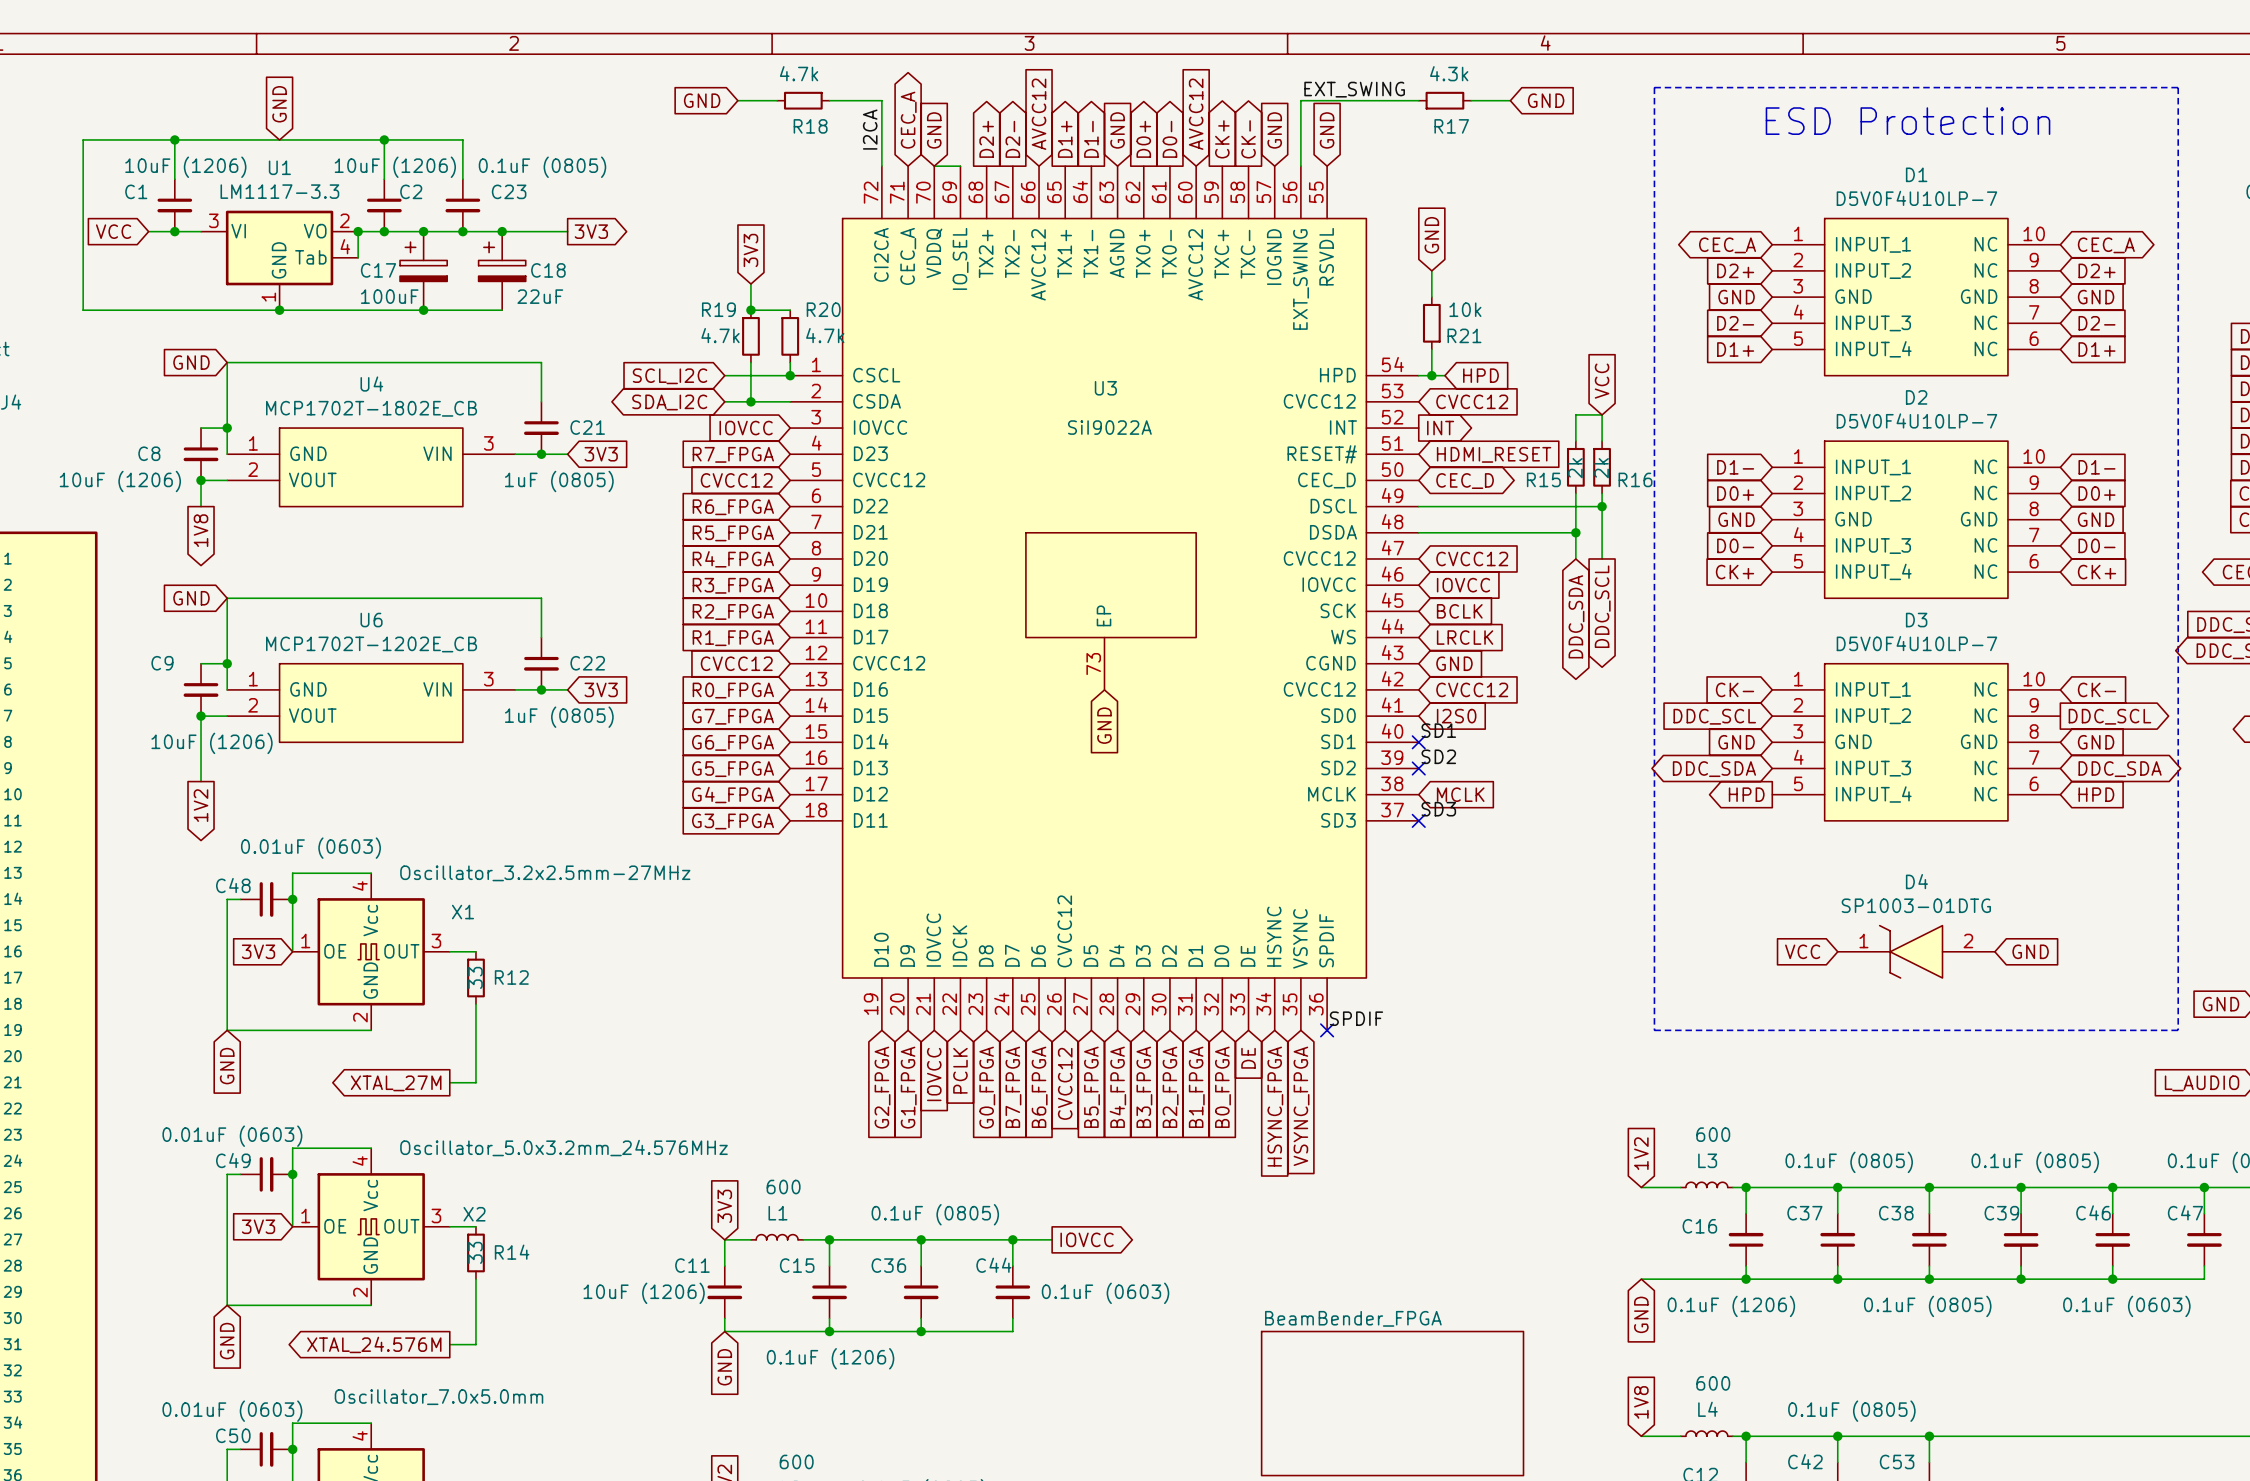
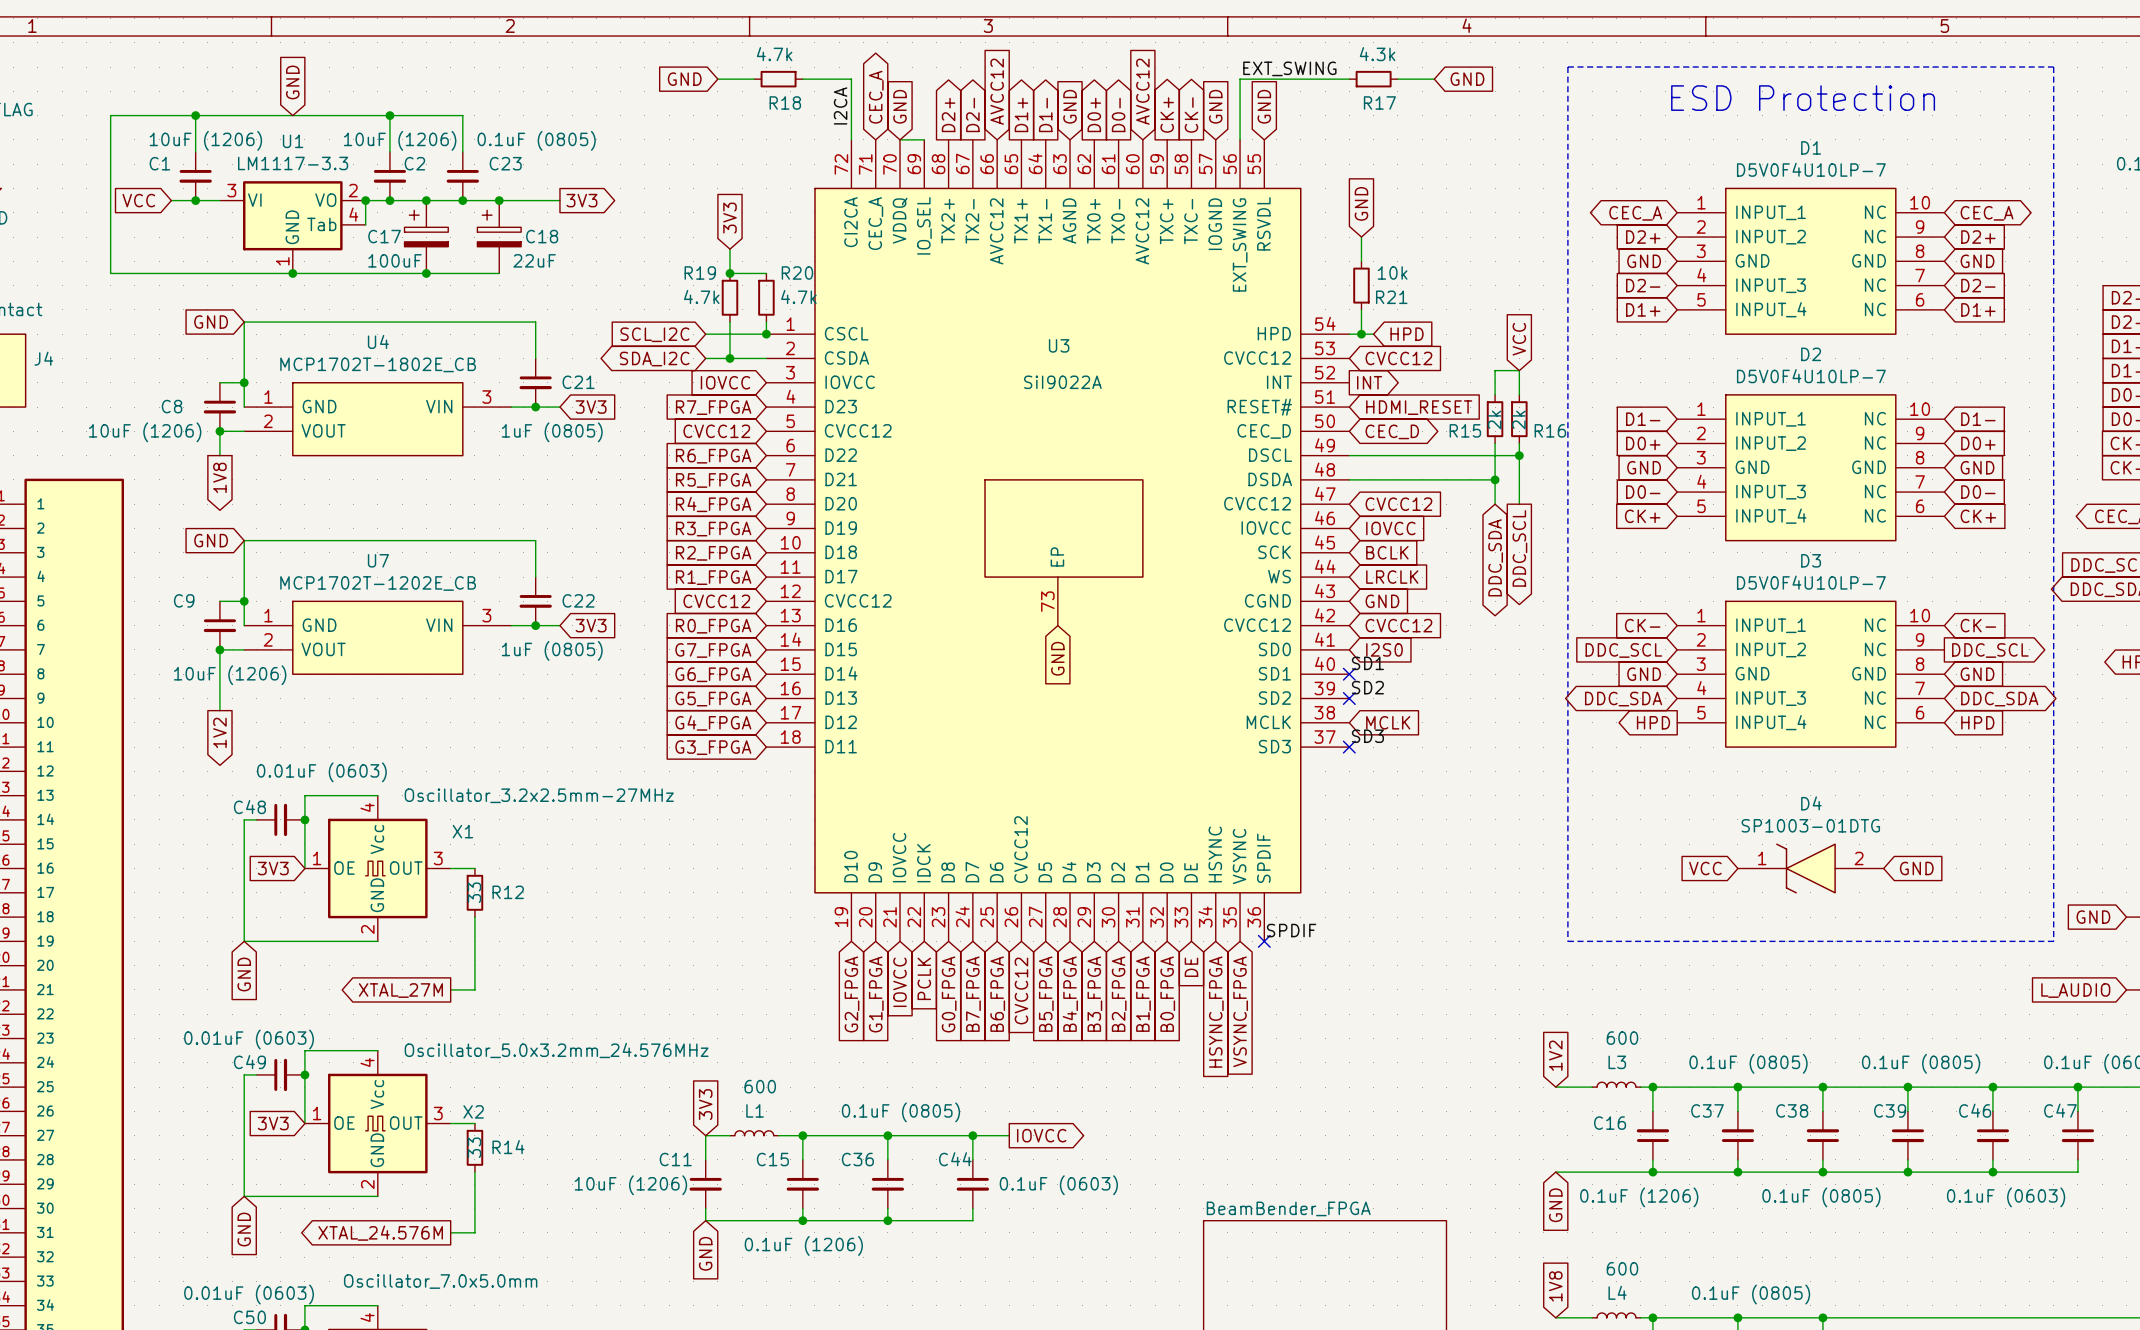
U6 name: U6 (371, 620) -> U7 (378, 560)

